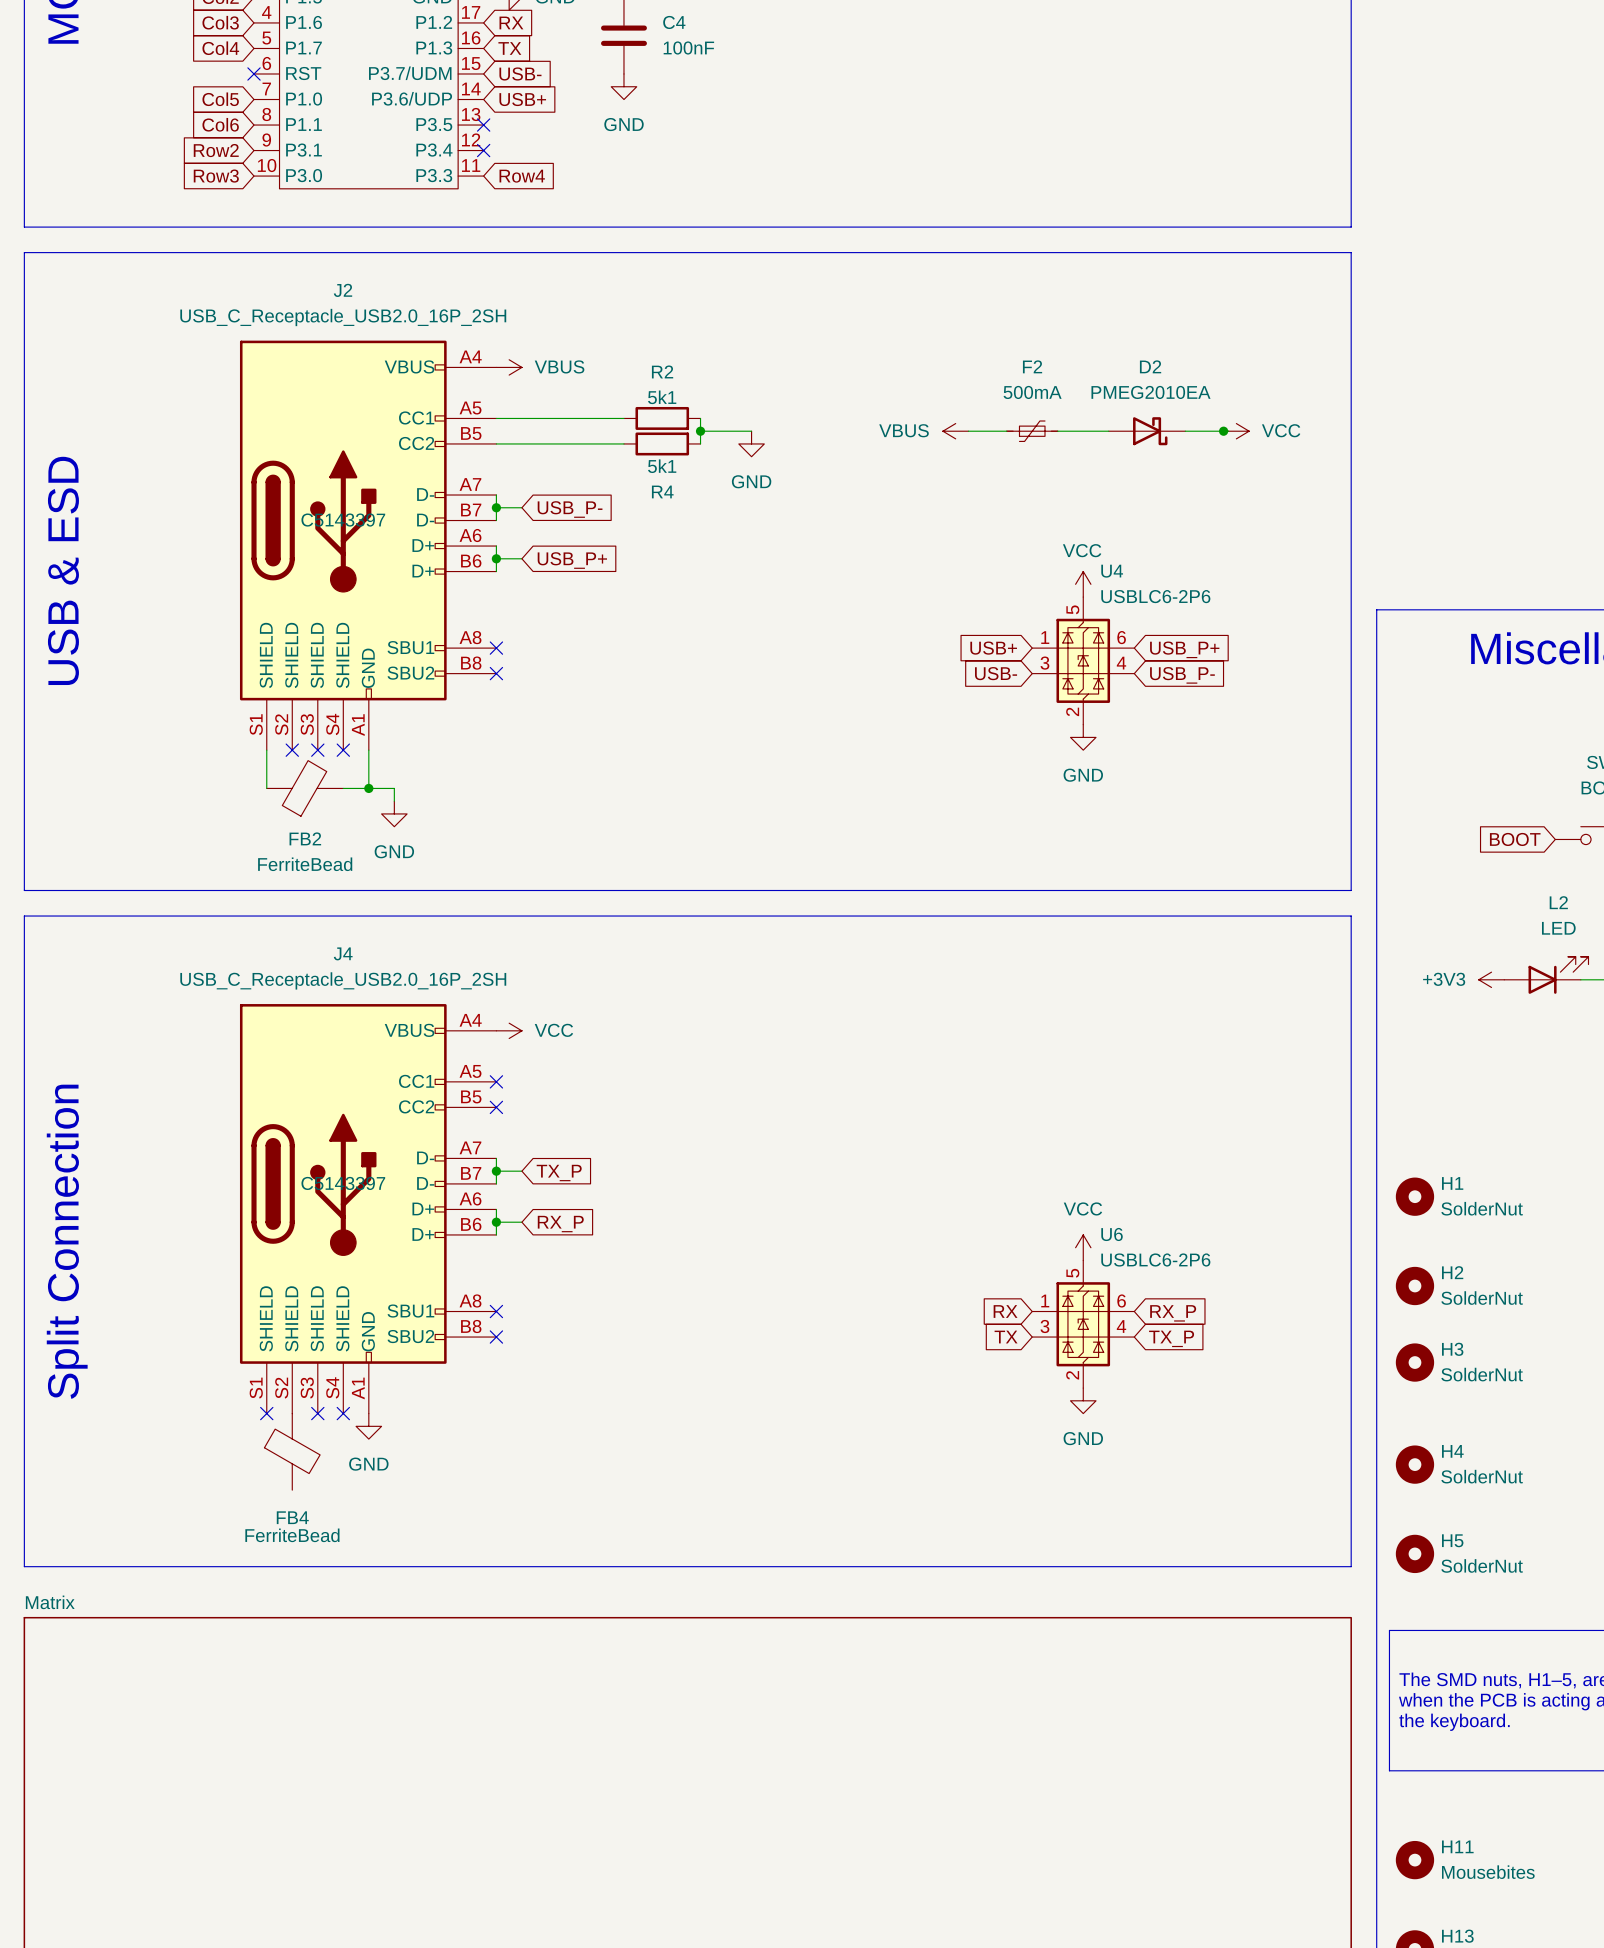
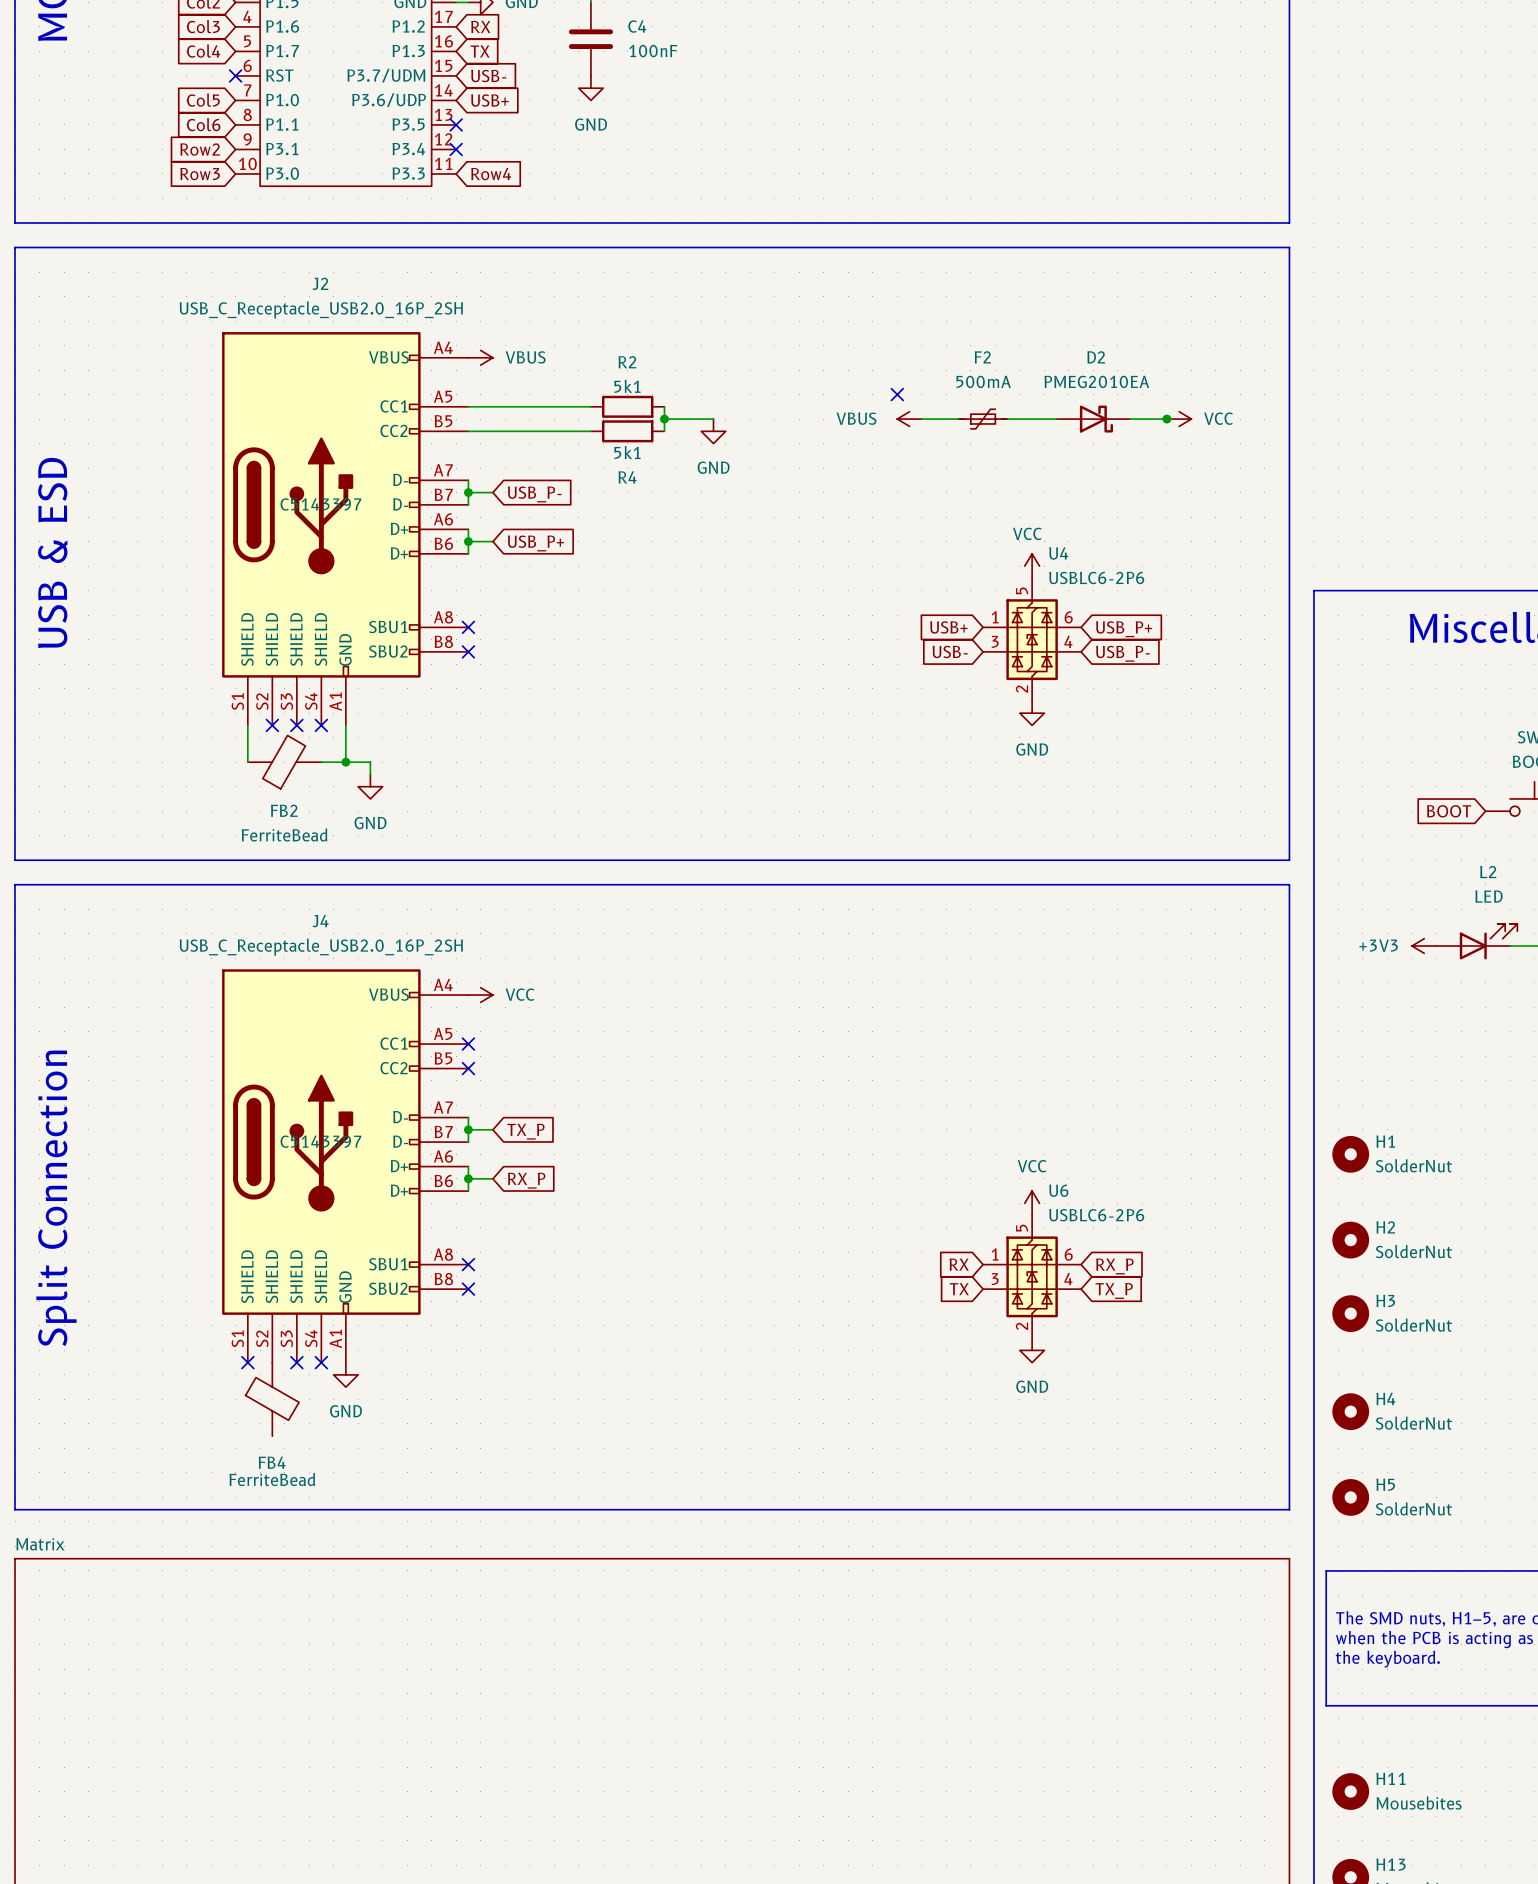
no-connect mark: none -> (897, 394)

